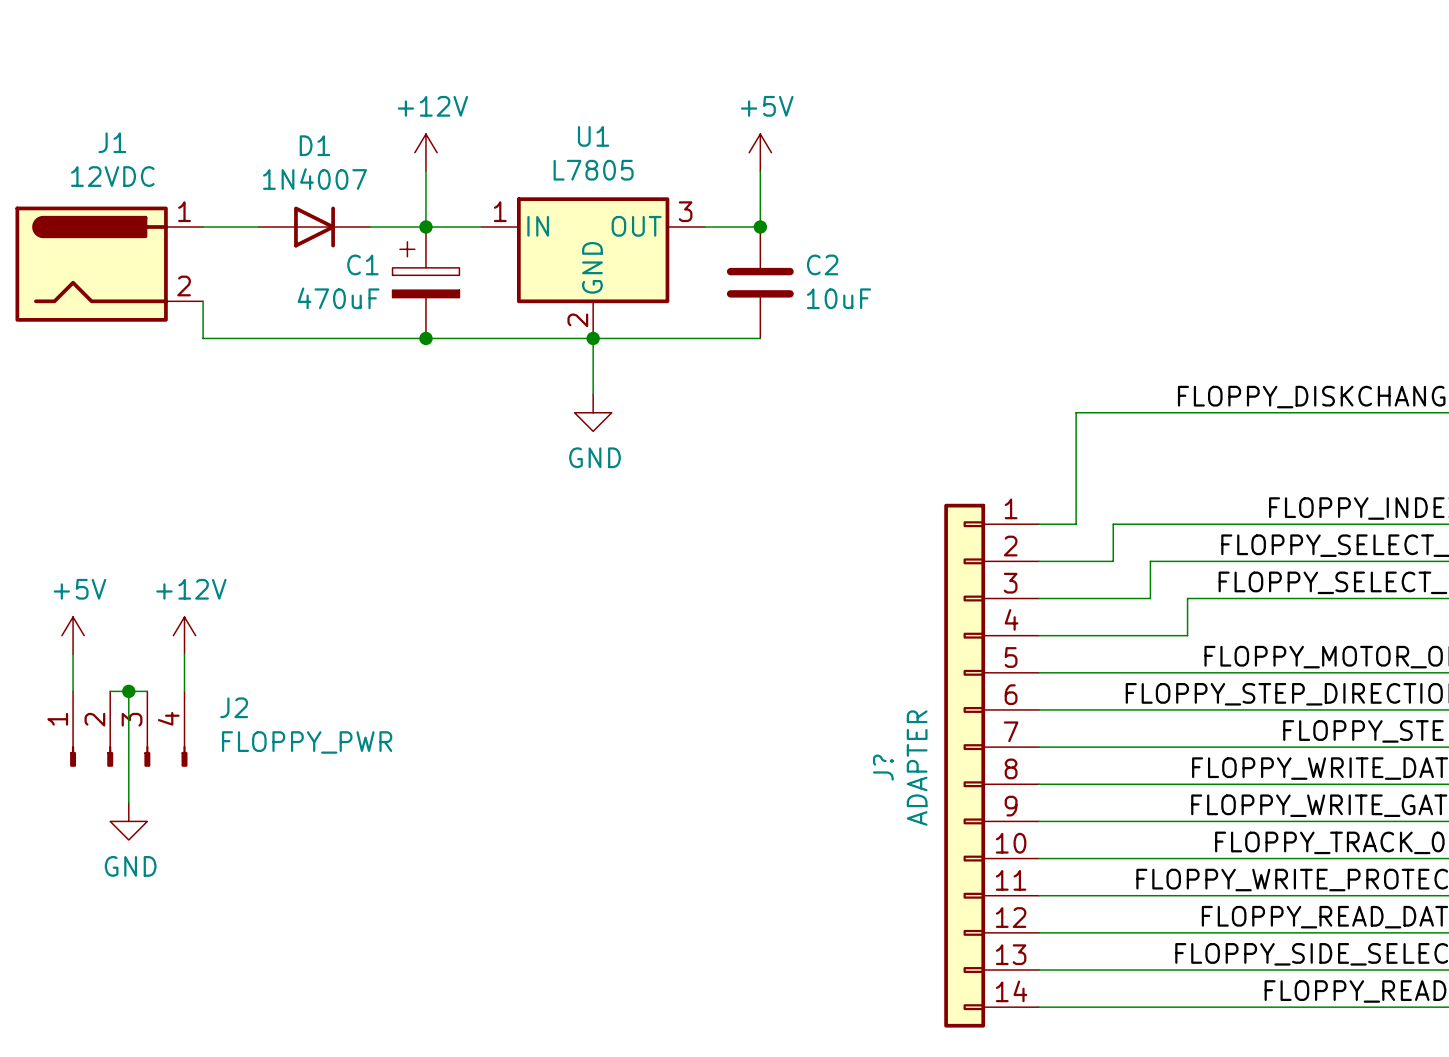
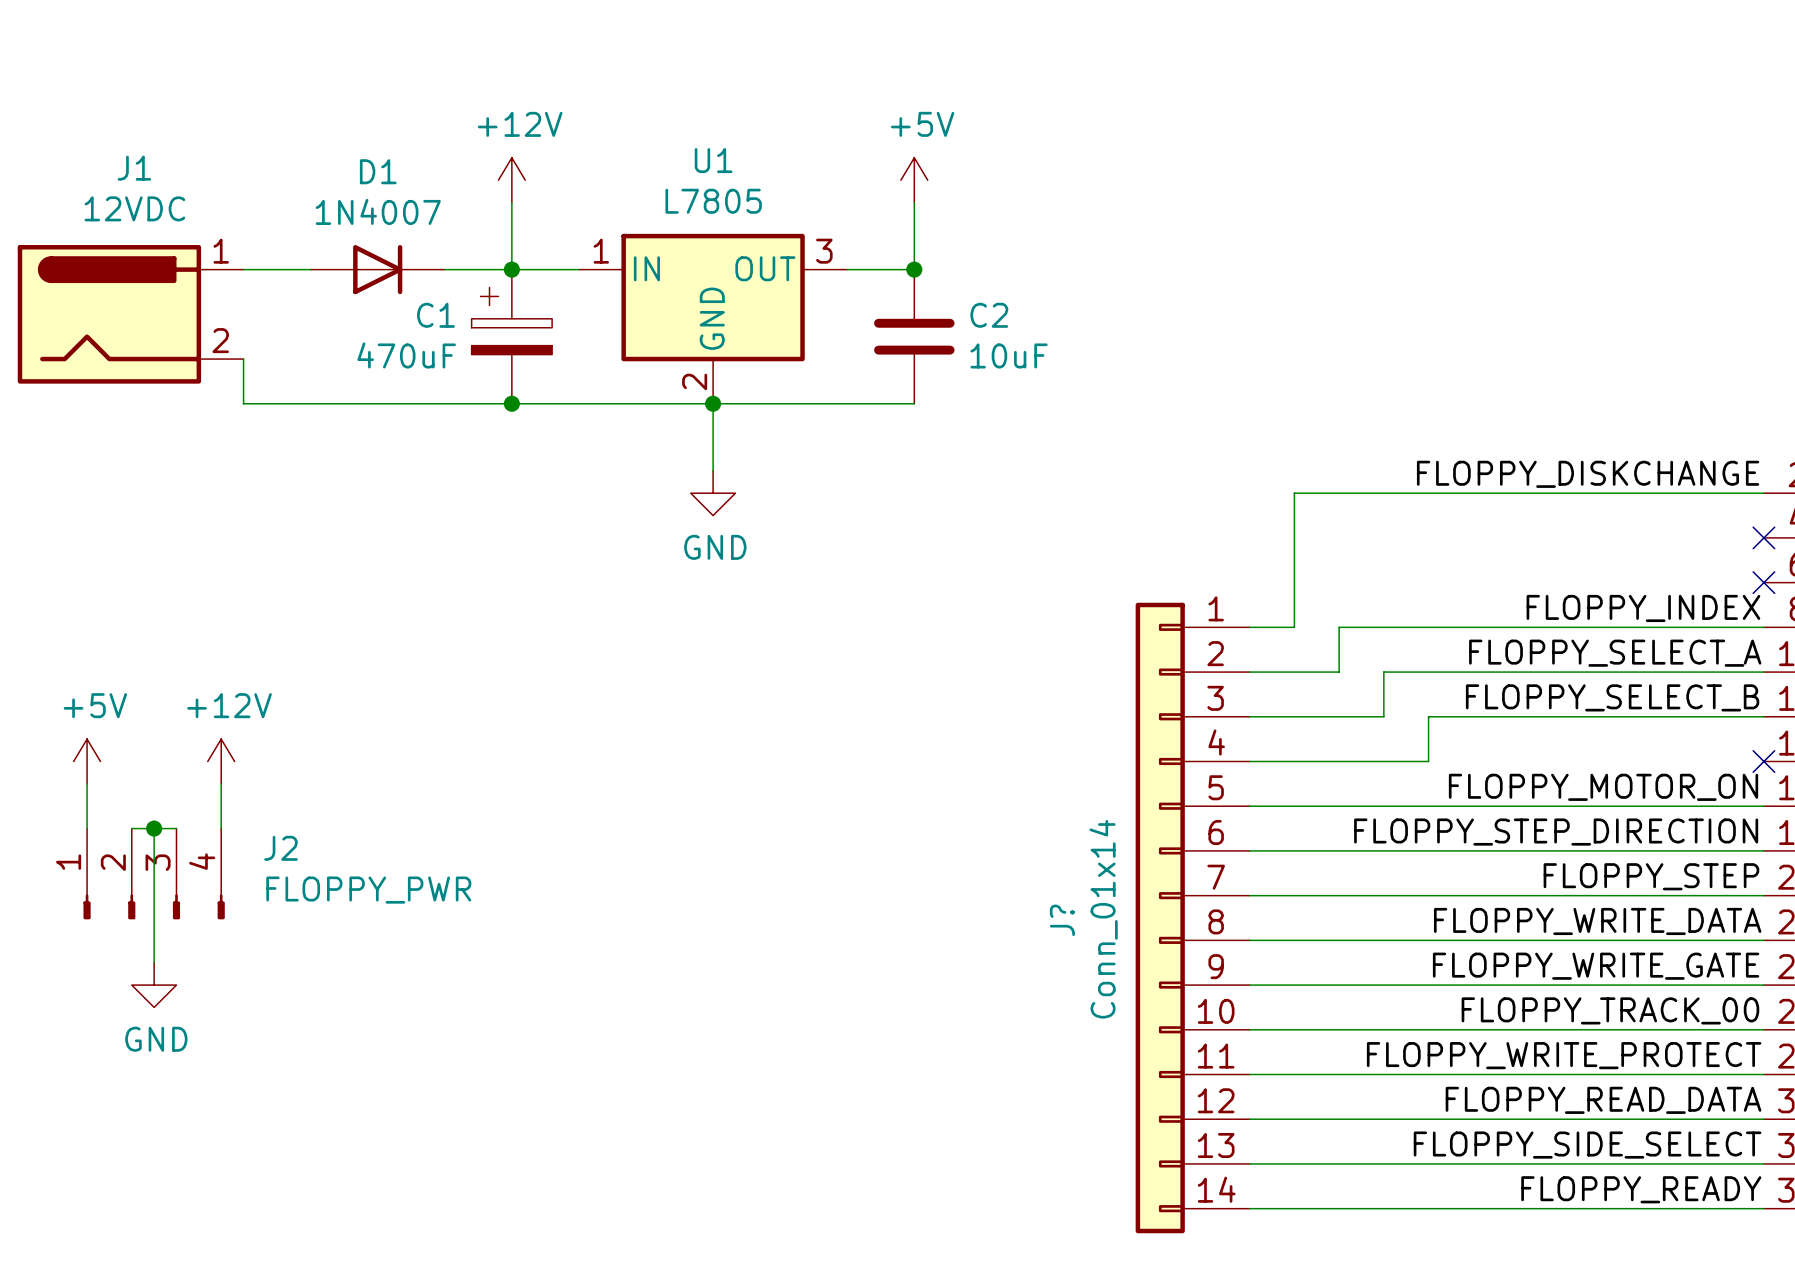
J? value: ADAPTER (917, 768) -> Conn_01x14 (1103, 919)

